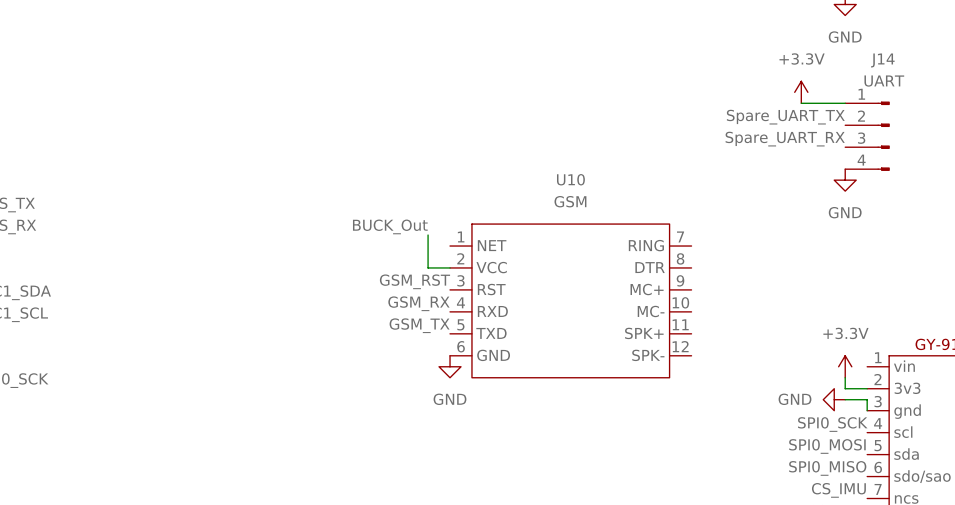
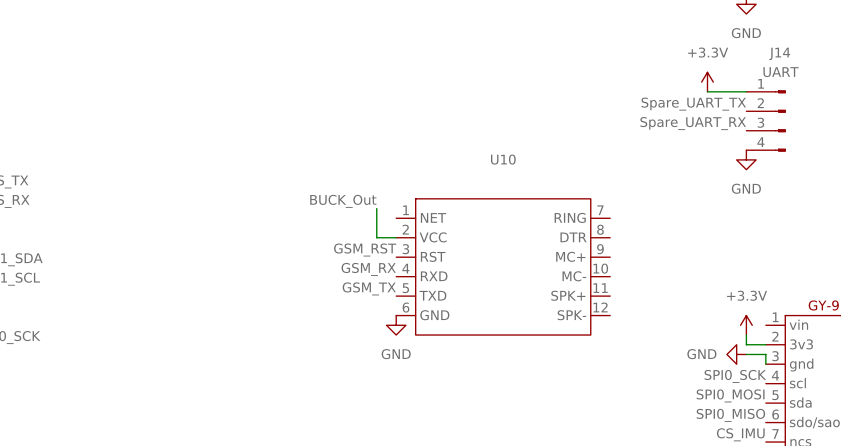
U10 value: GSM (570, 201) -> none

